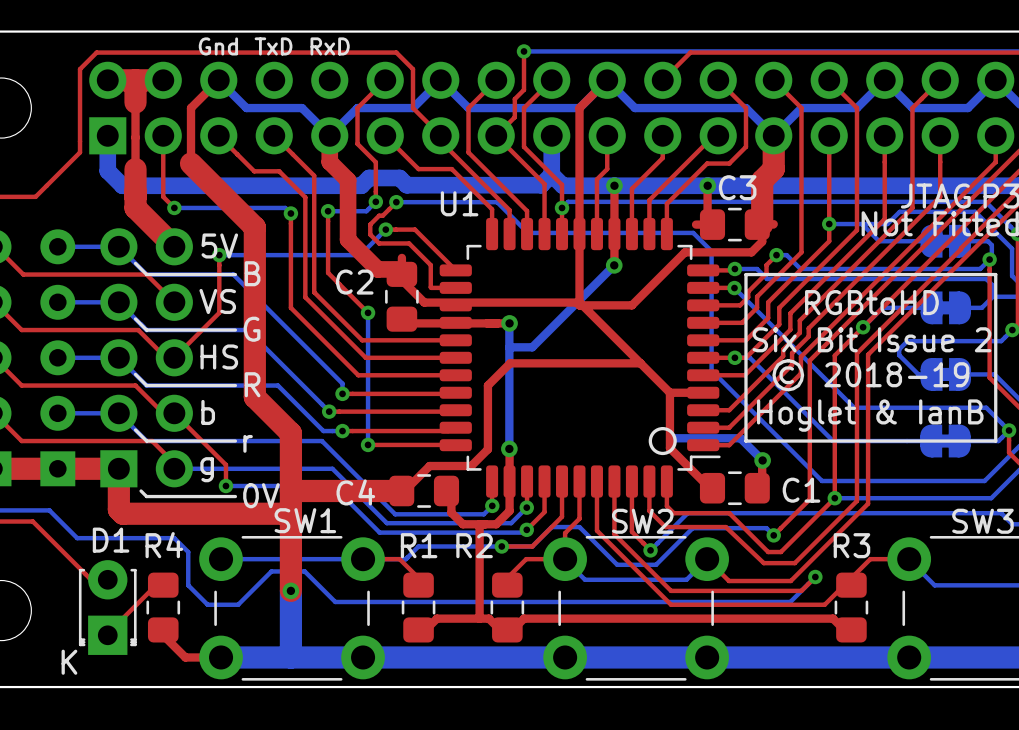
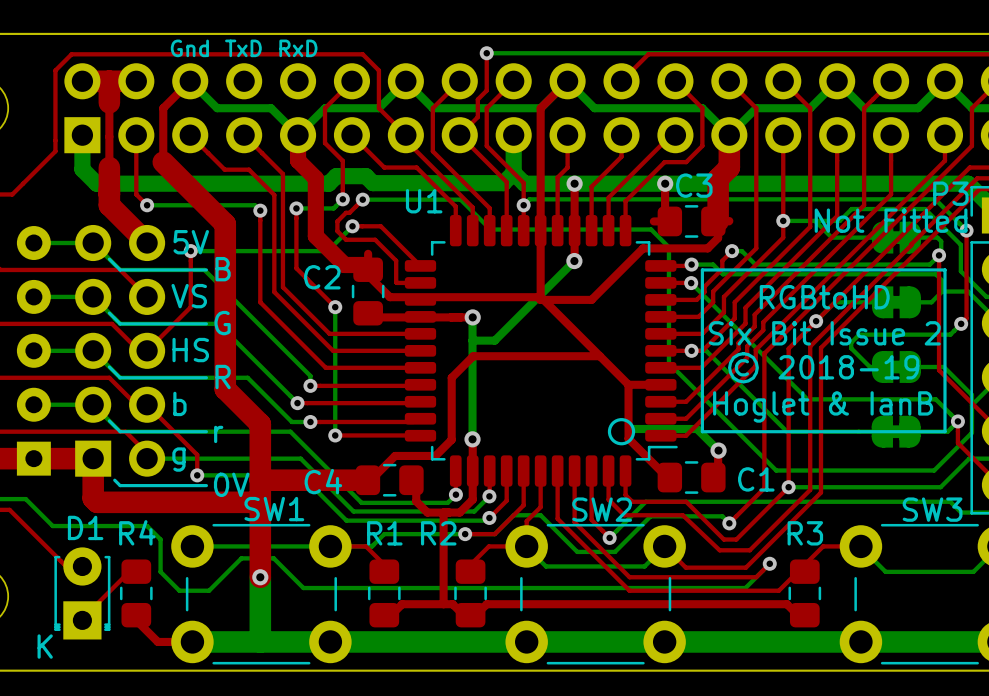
text: JTAG (935, 196) -> none

